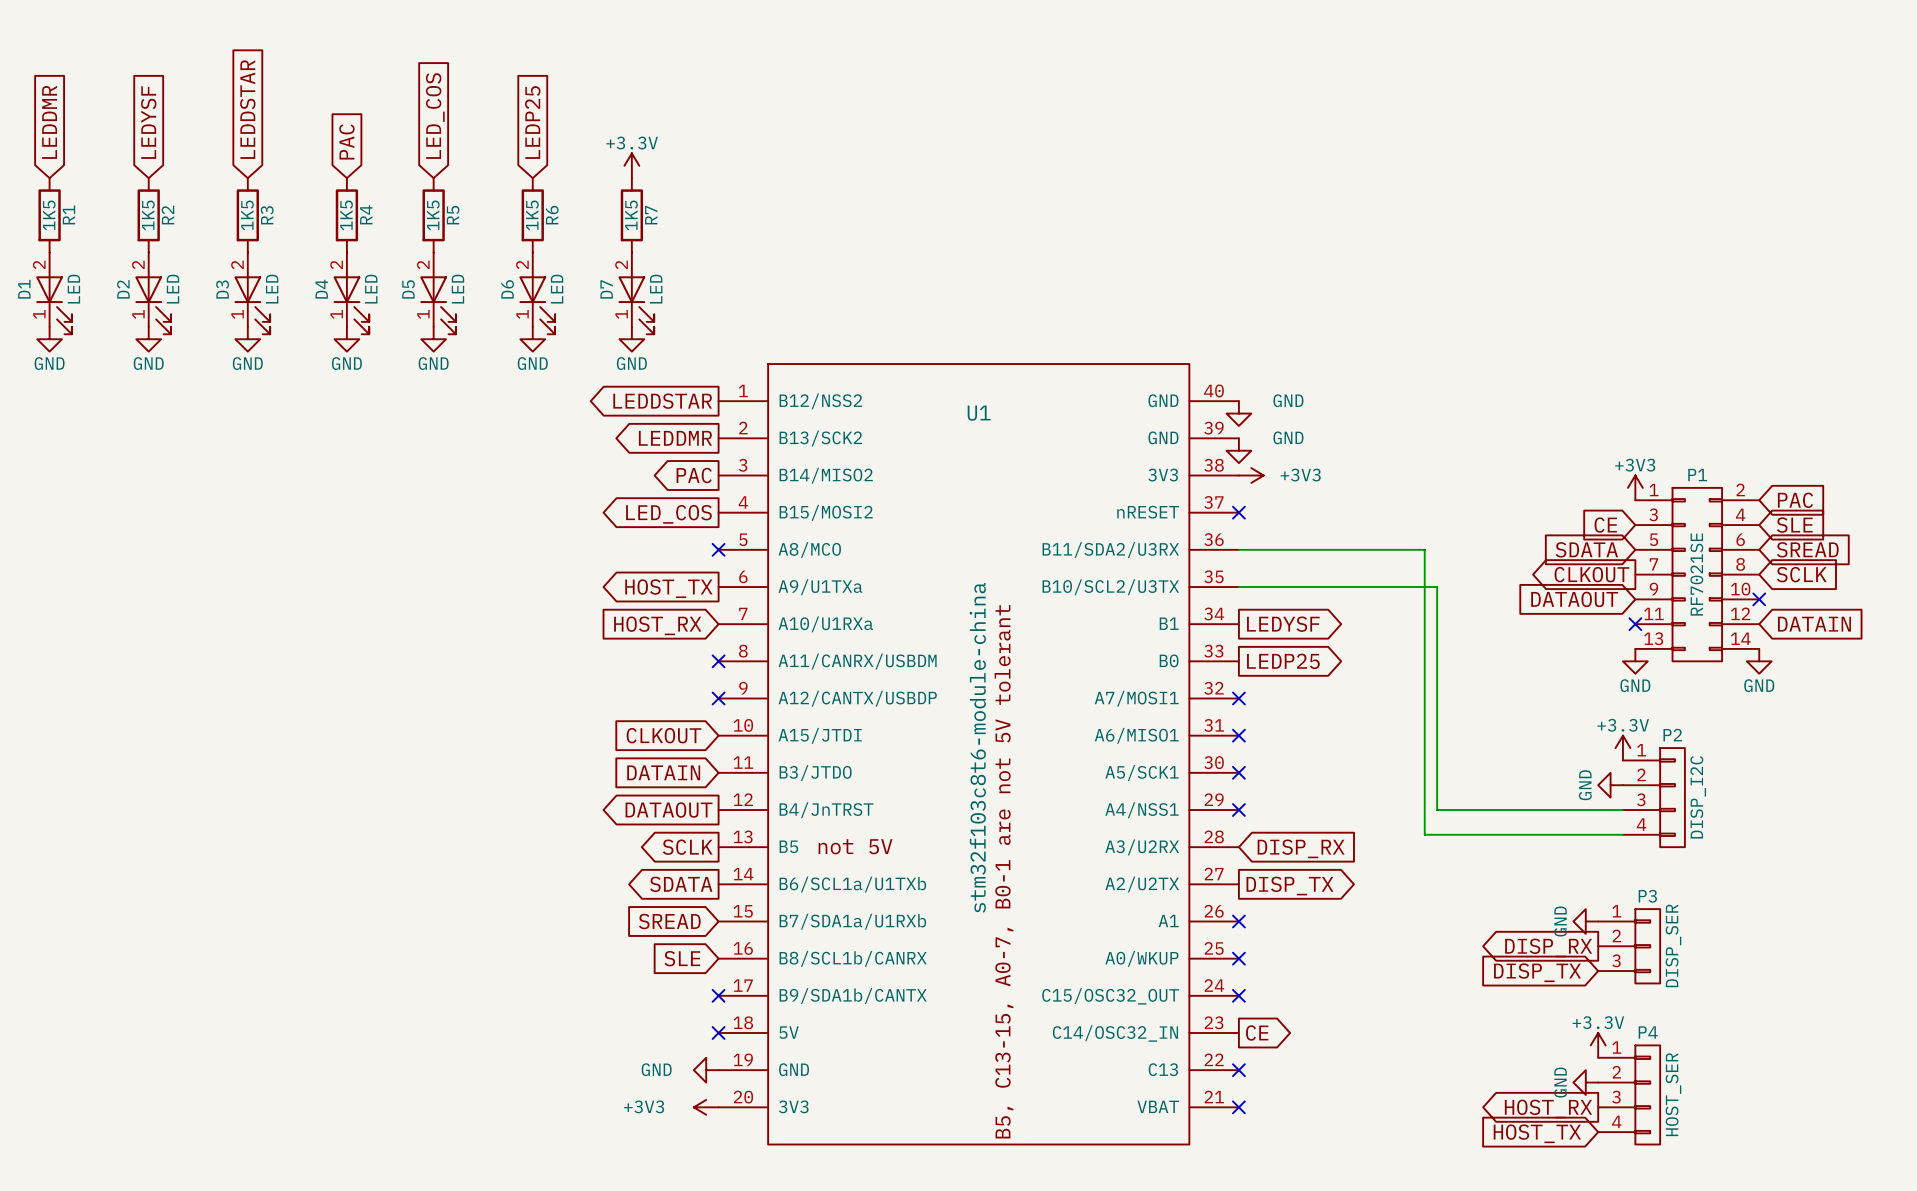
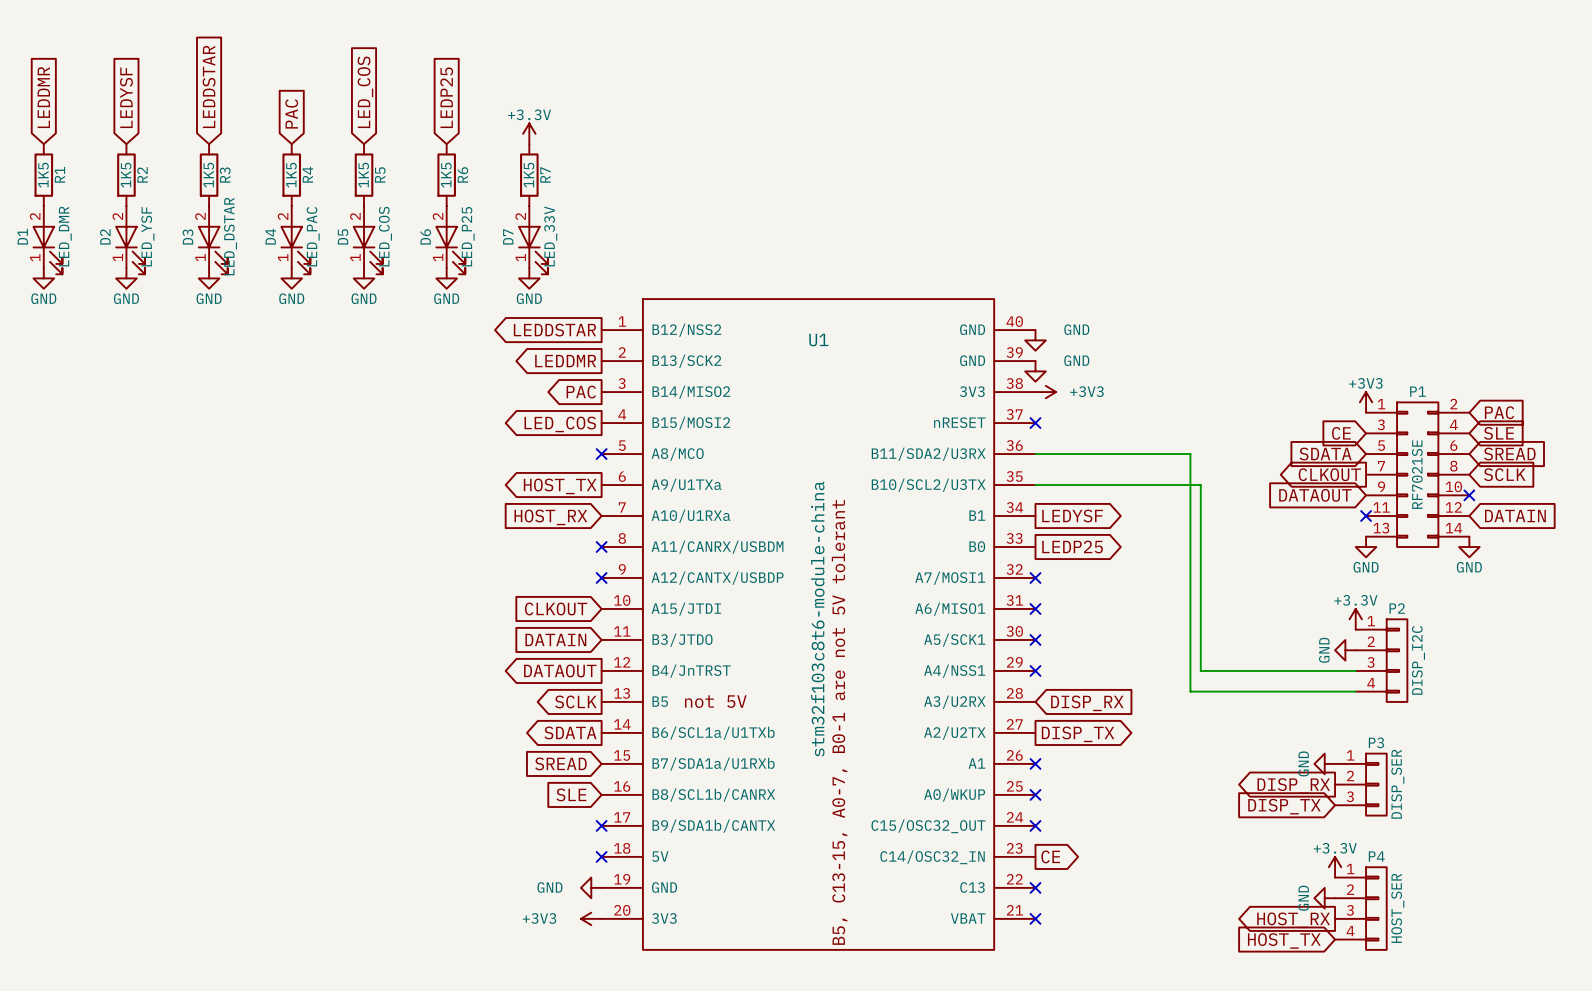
D1 value: LED (73, 289) -> LED_DMR (65, 236)
D2 value: LED (173, 289) -> LED_YSF (147, 236)
D3 value: LED (272, 289) -> LED_DSTAR (230, 236)
D4 value: LED (371, 289) -> LED_PAC (313, 236)
D5 value: LED (457, 289) -> LED_COS (385, 236)
D6 value: LED (557, 289) -> LED_P25 (468, 236)
D7 value: LED (656, 289) -> LED_33V (550, 236)

